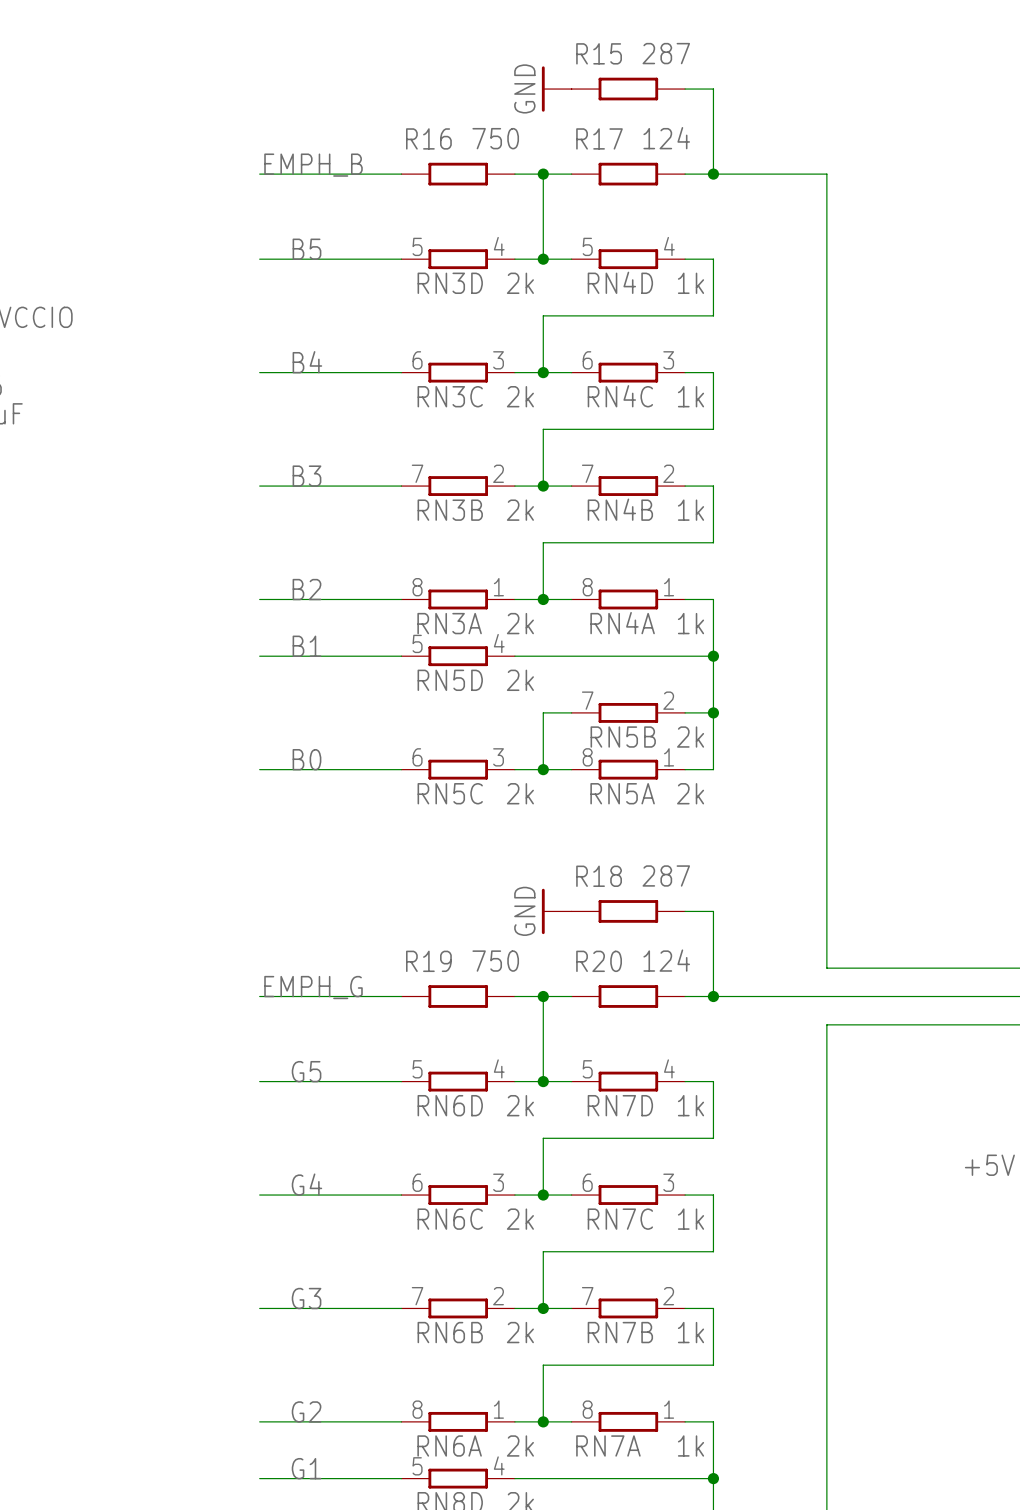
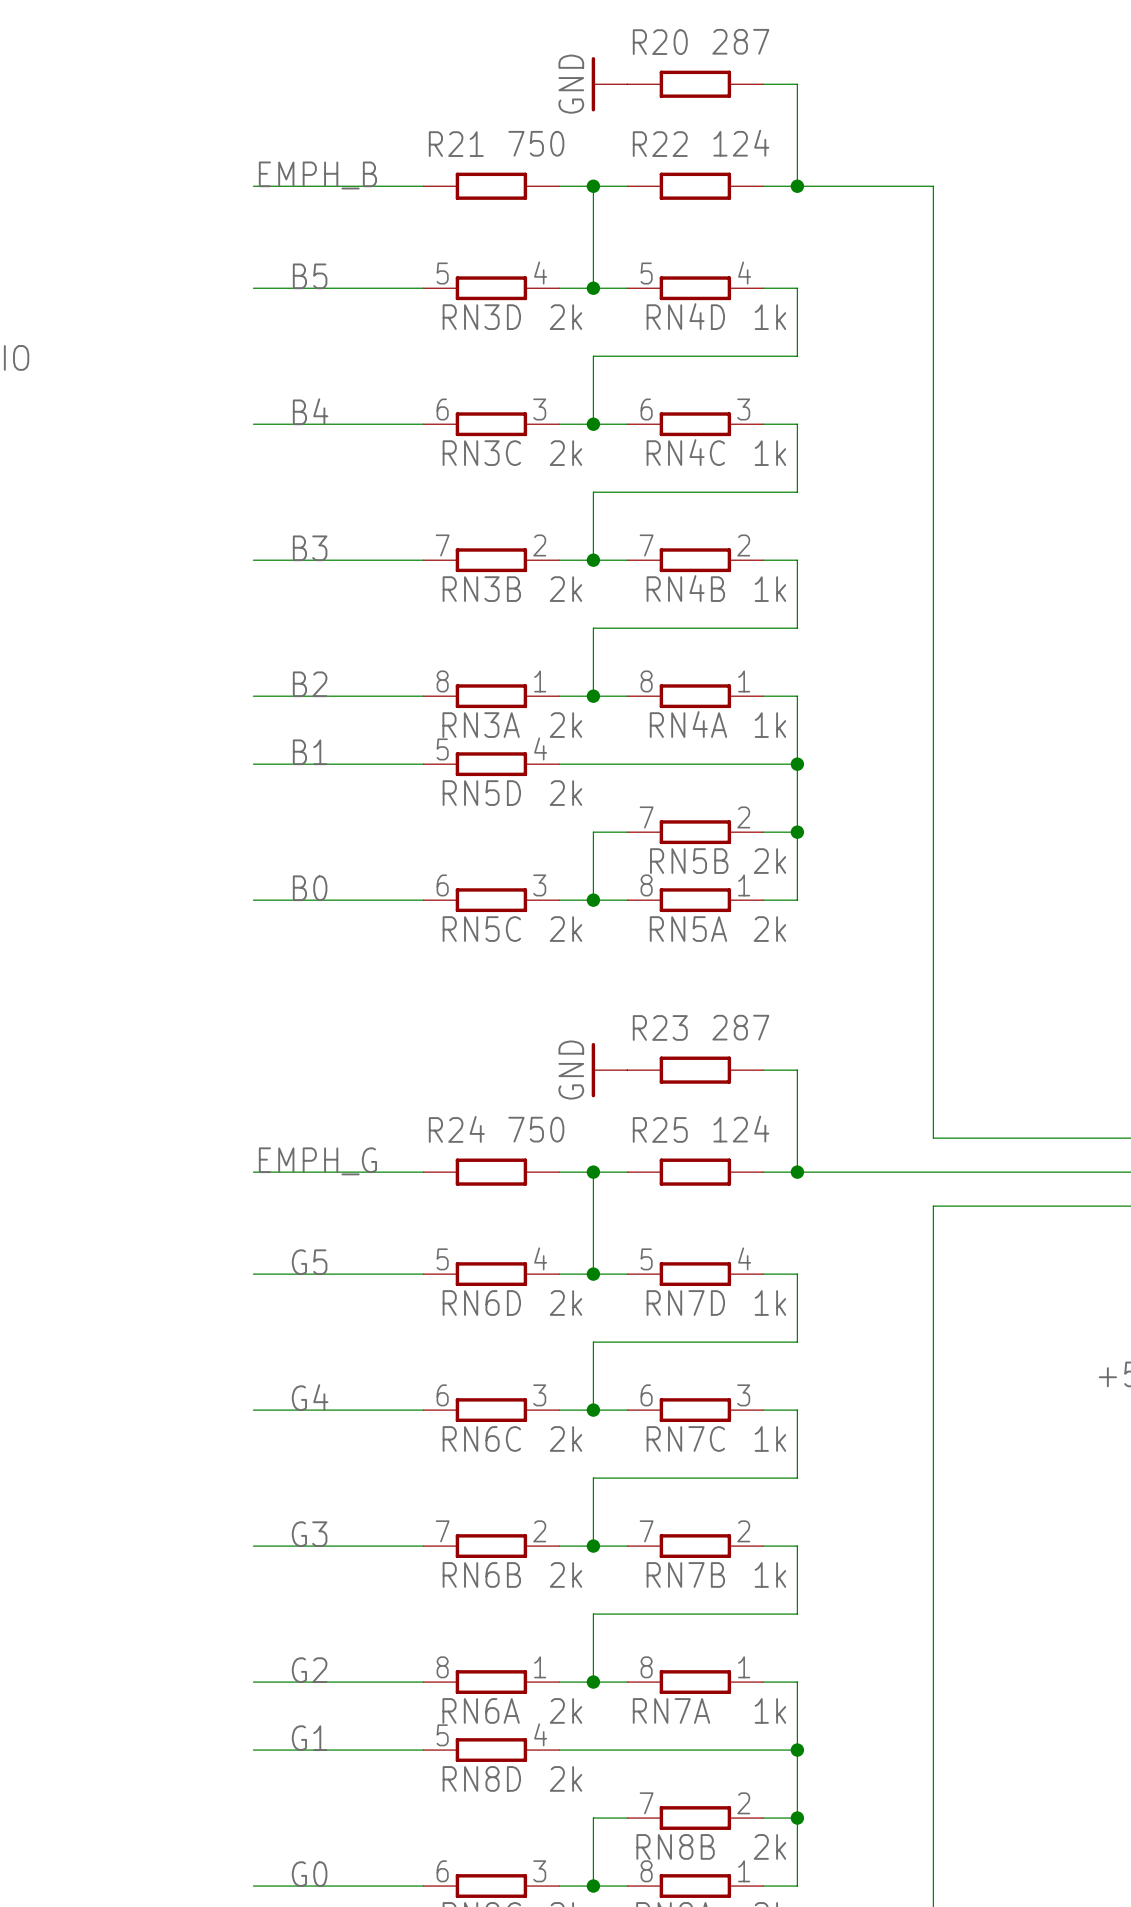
R15 name: R15 (599, 53) -> R20 (660, 42)
R16 name: R16 (428, 138) -> R21 (456, 144)
R17 name: R17 (599, 138) -> R22 (660, 144)
R18 name: R18 (599, 876) -> R23 (660, 1027)
R19 name: R19 (428, 961) -> R24 (456, 1129)
R20 name: R20 (599, 961) -> R25 (660, 1129)

